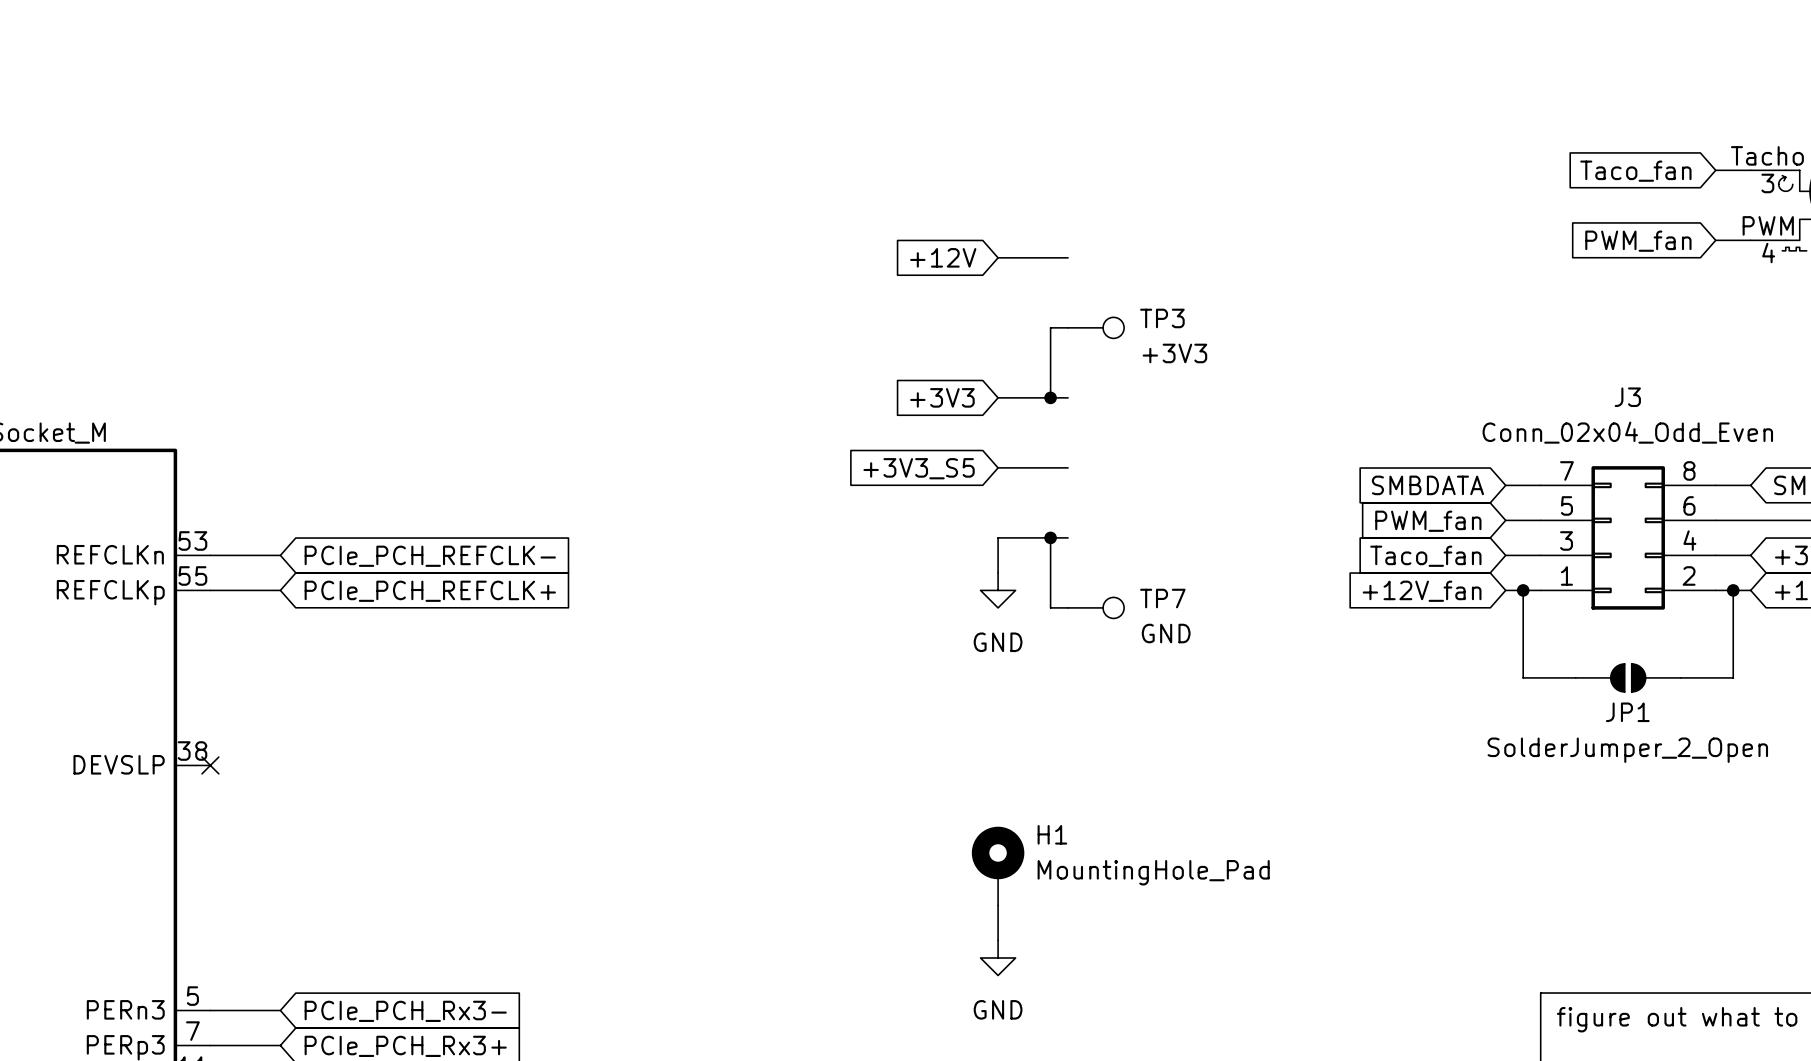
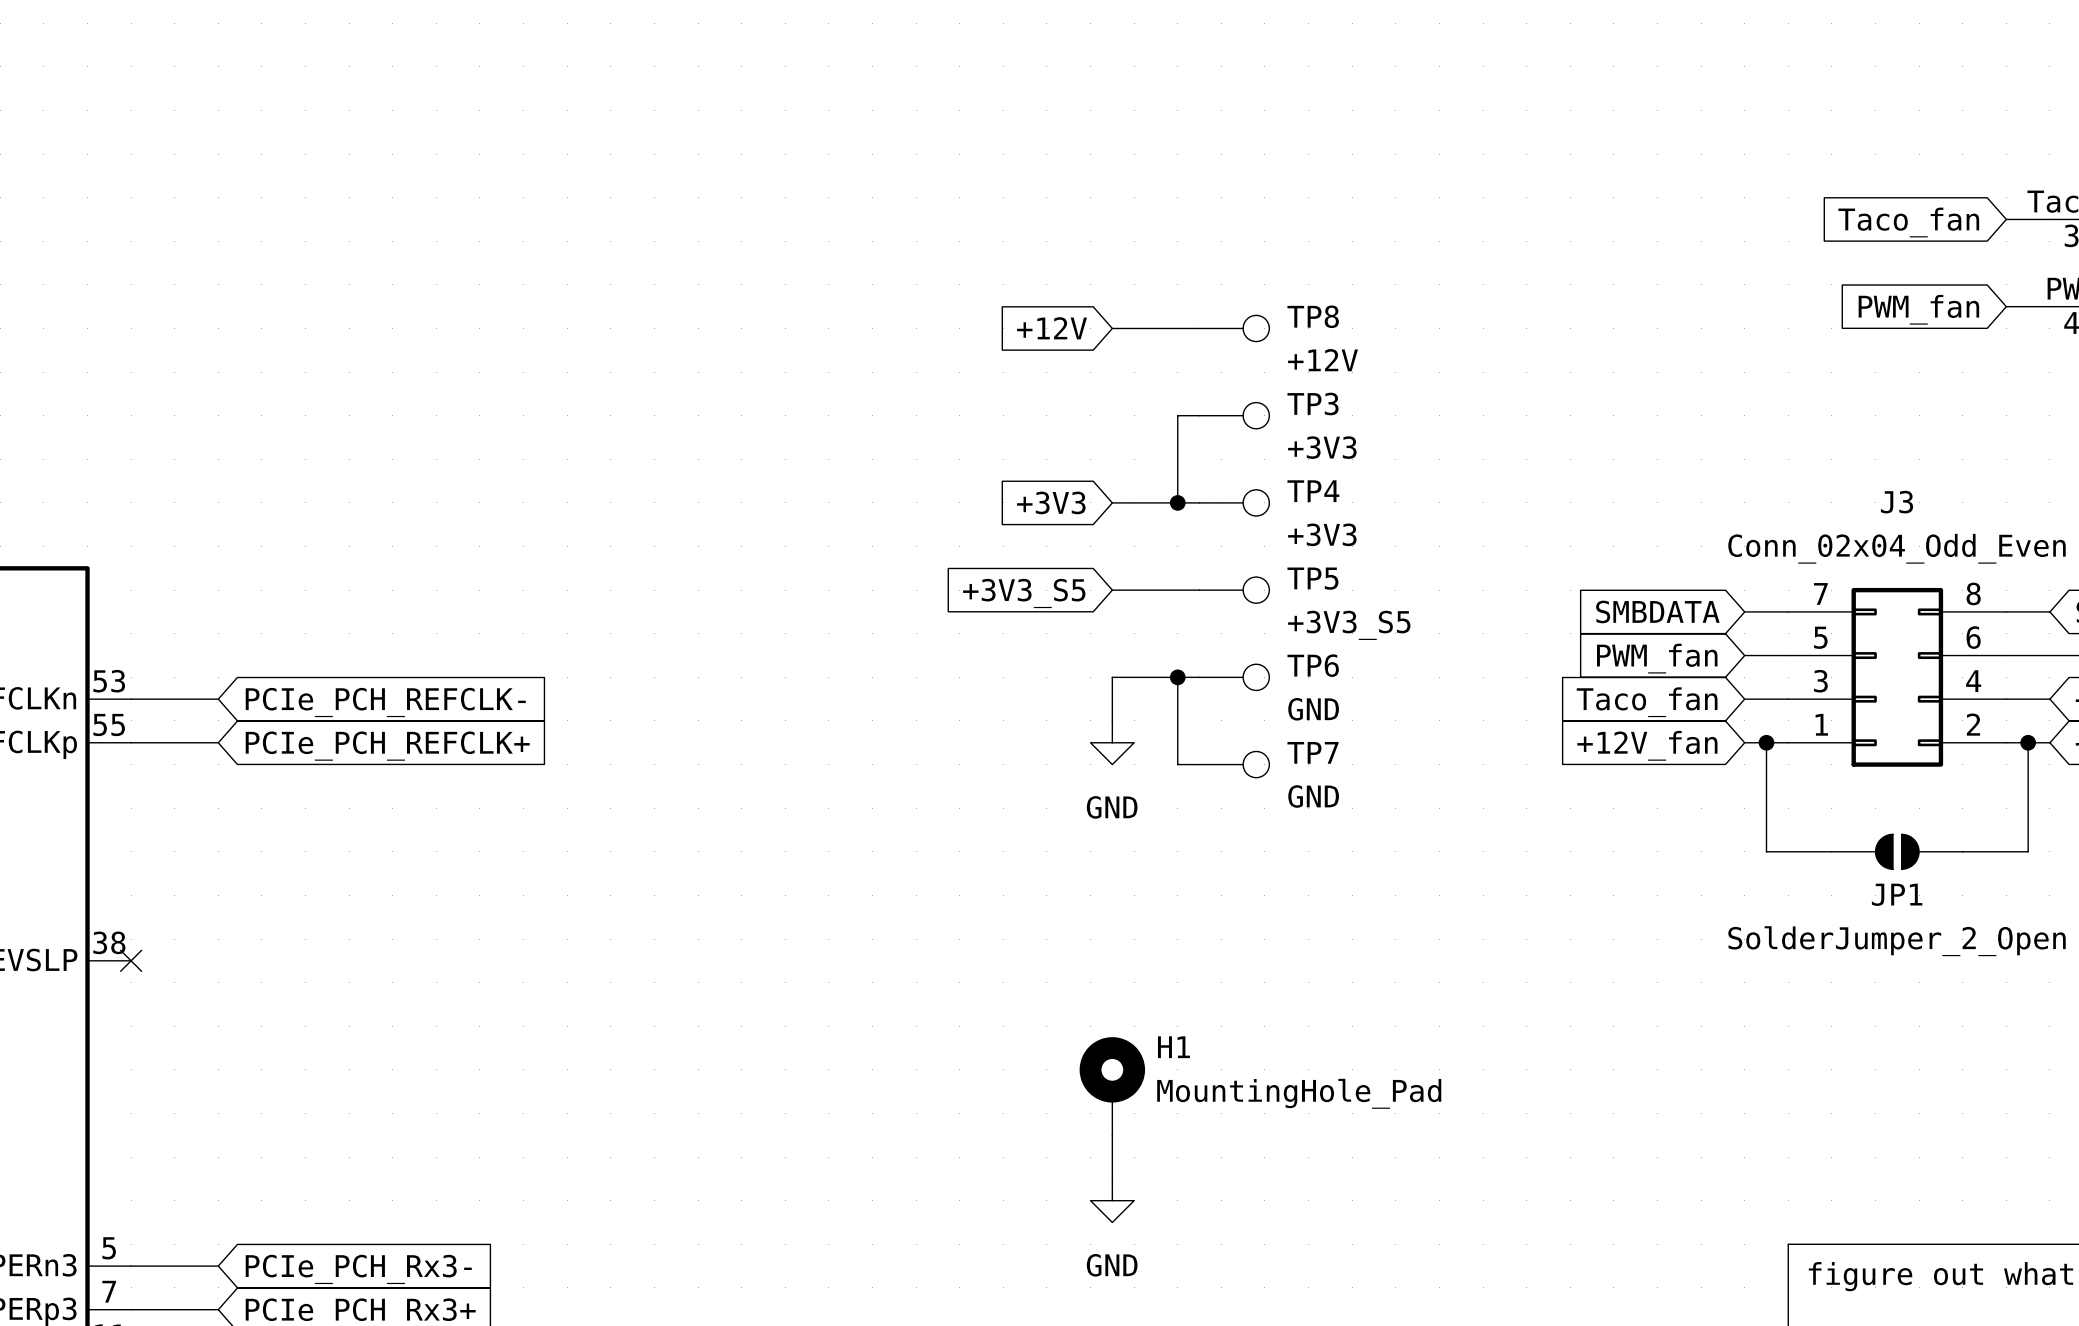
TP8: none -> +12V (1234, 328)
TP4: none -> +3V3 (1234, 502)
TP5: none -> +3V3_S5 (1234, 590)
TP6: none -> GND (1234, 677)

